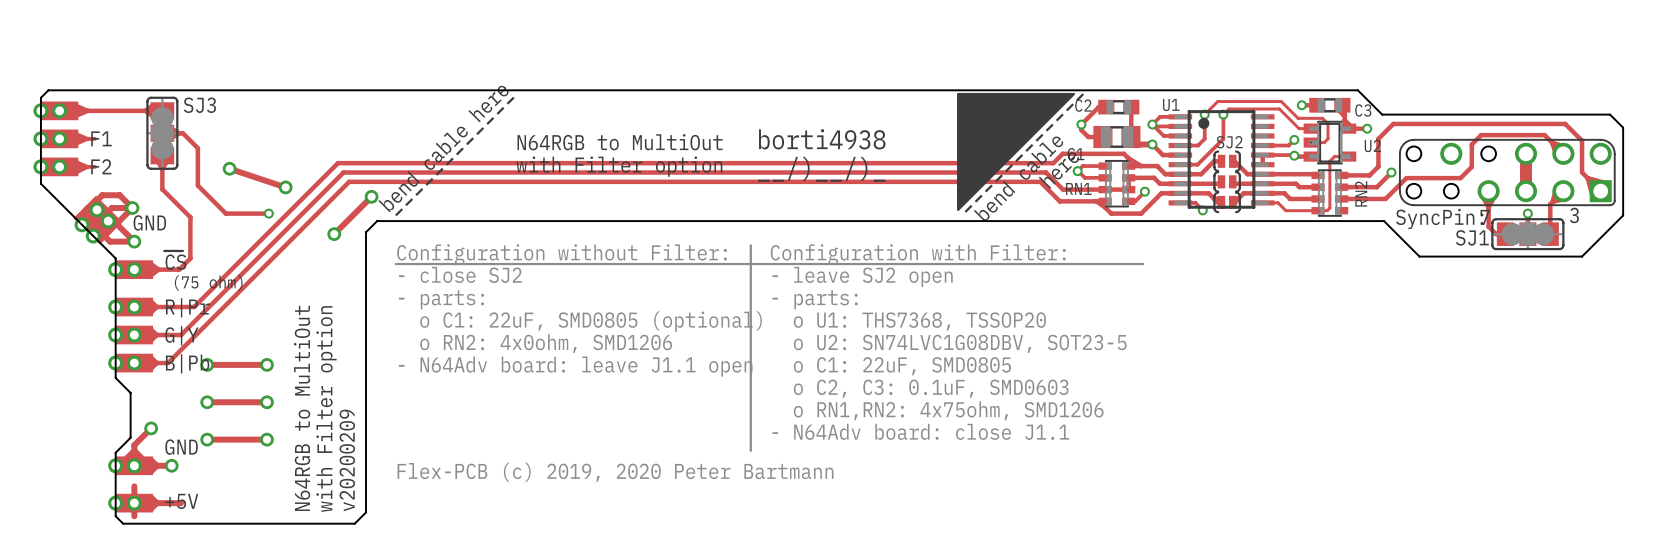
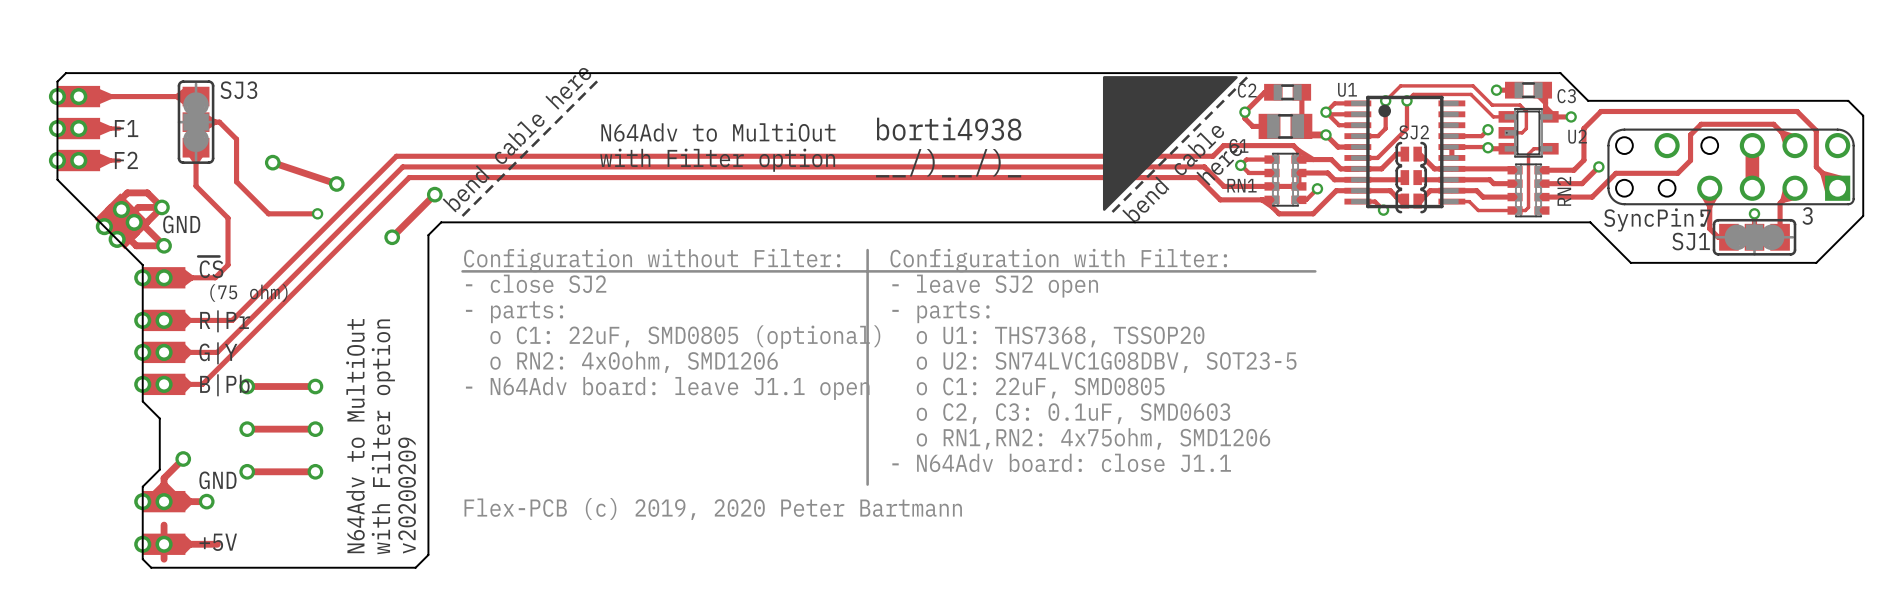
text: N64RGB to MultiOut (620, 142) -> N64Adv to MultiOut (718, 132)
text: N64RGB to MultiOut (302, 408) -> N64Adv to MultiOut (355, 436)

